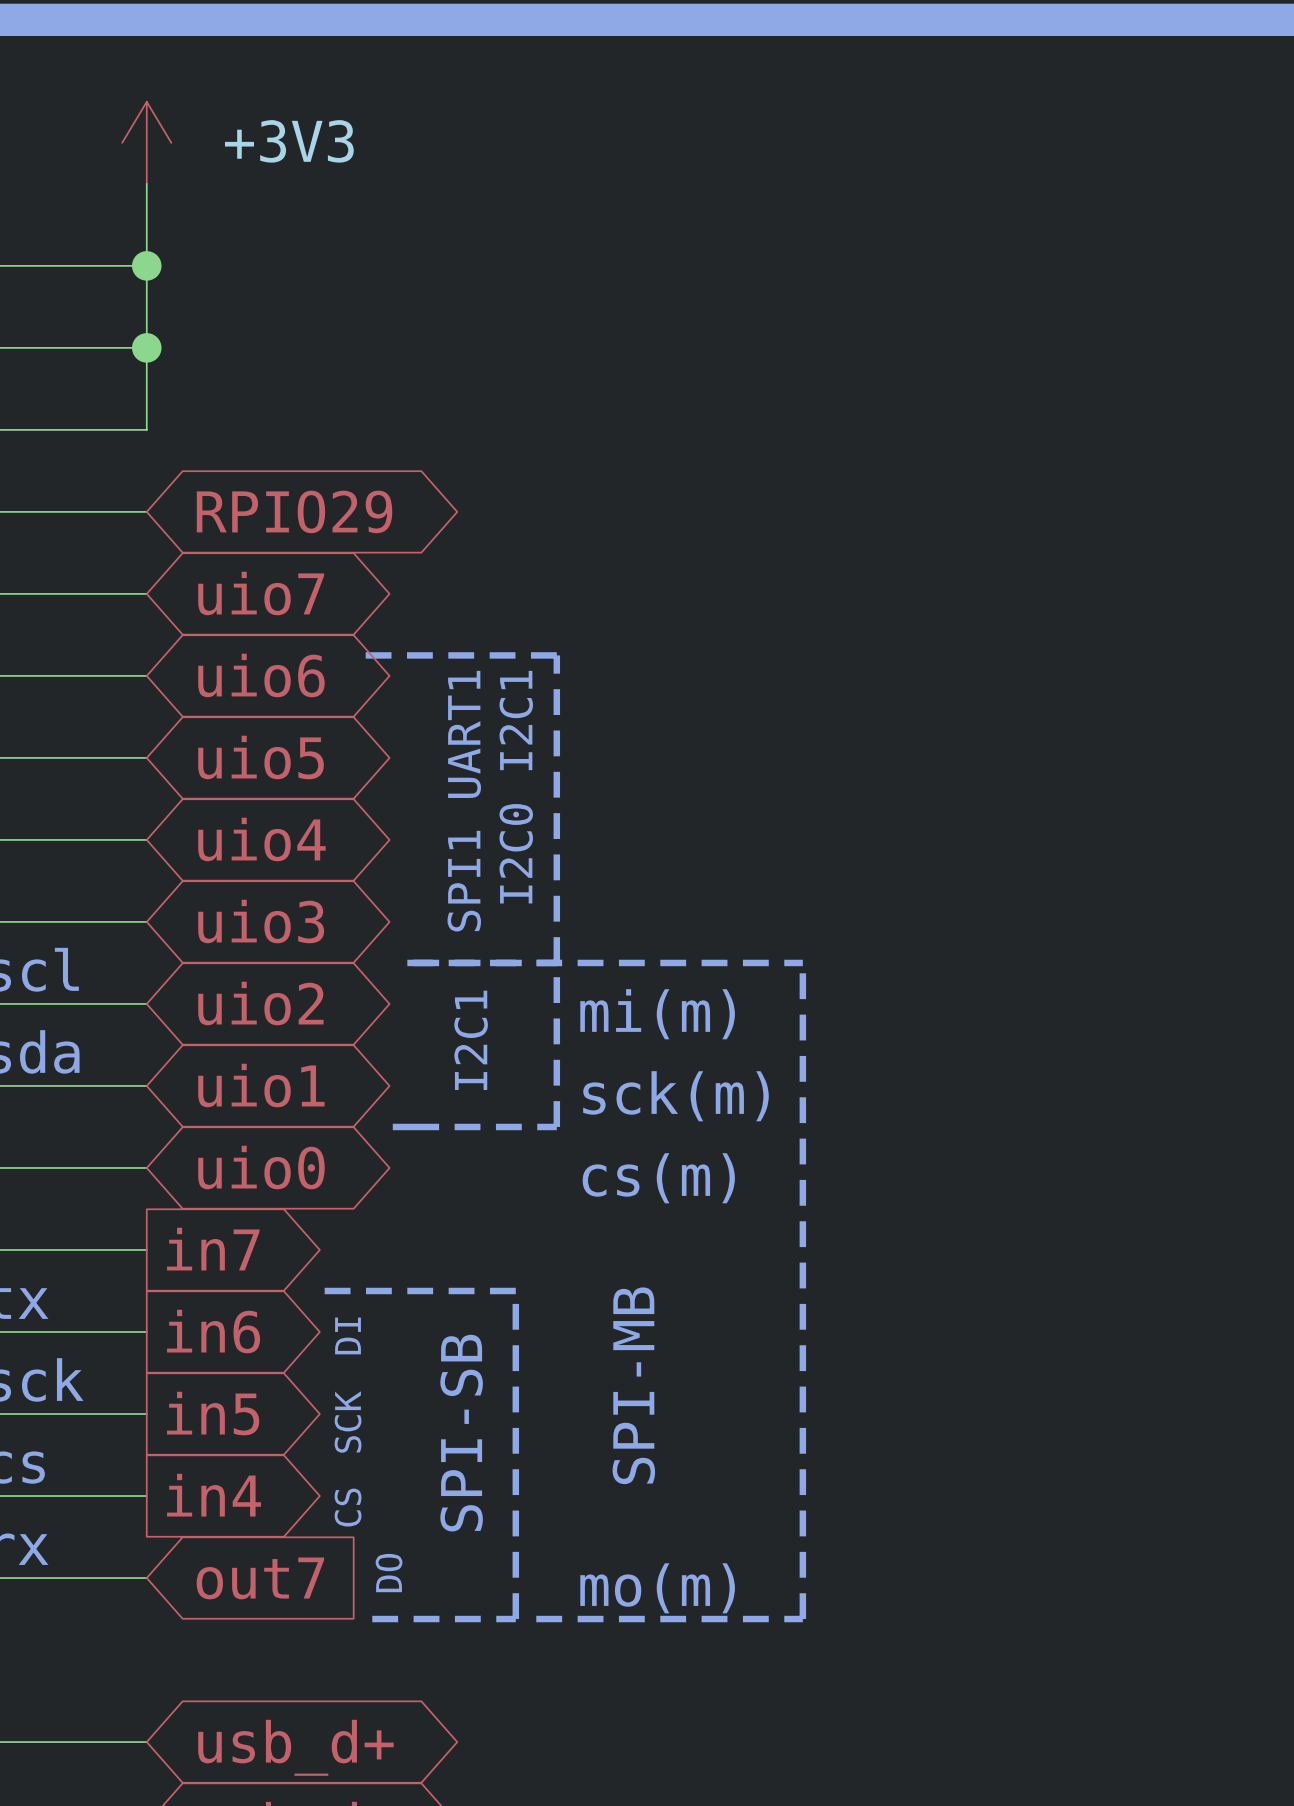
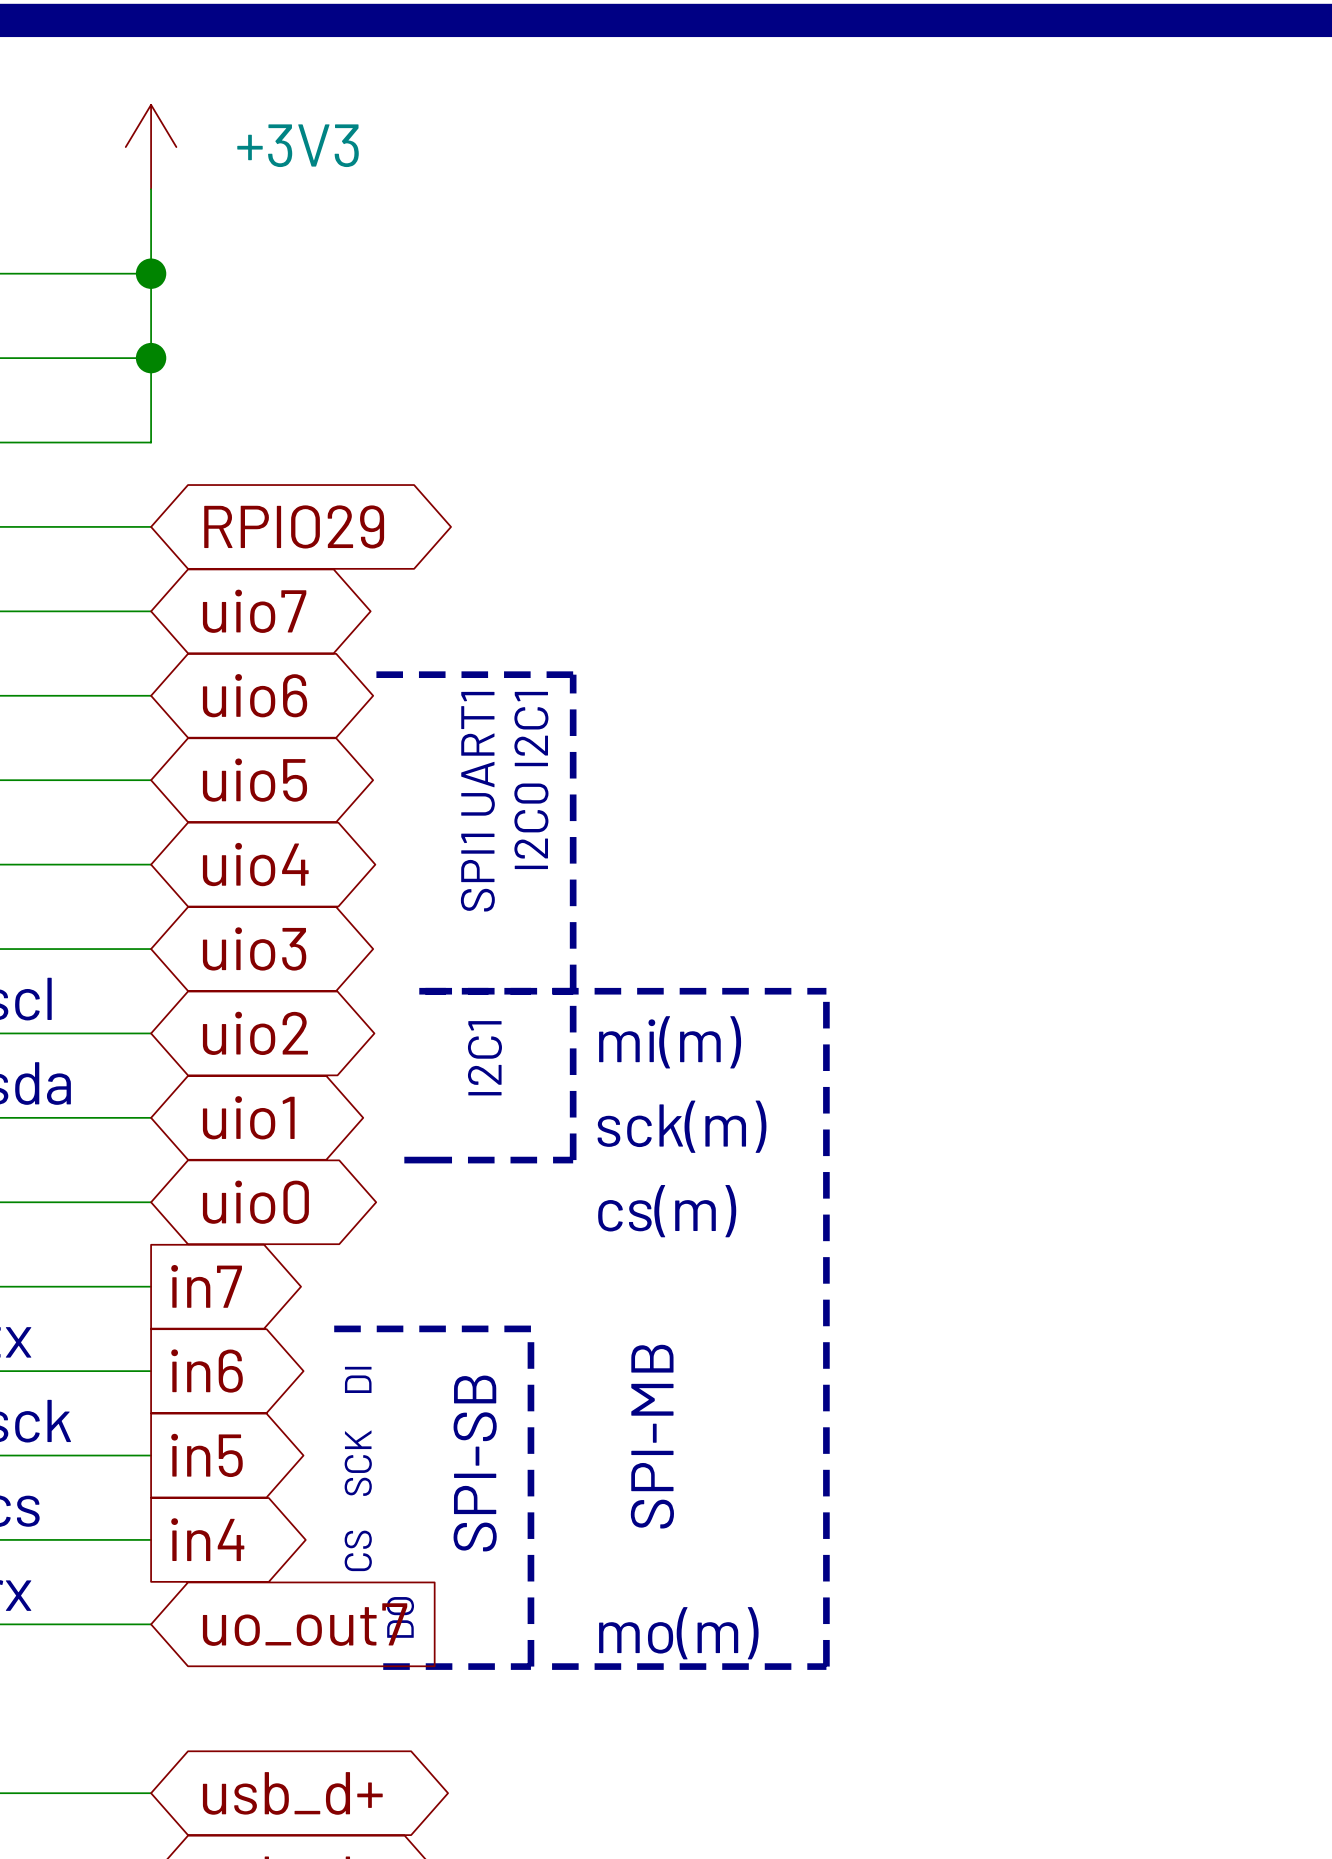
global label: out7 (260, 1578) -> uo_out7 (305, 1624)

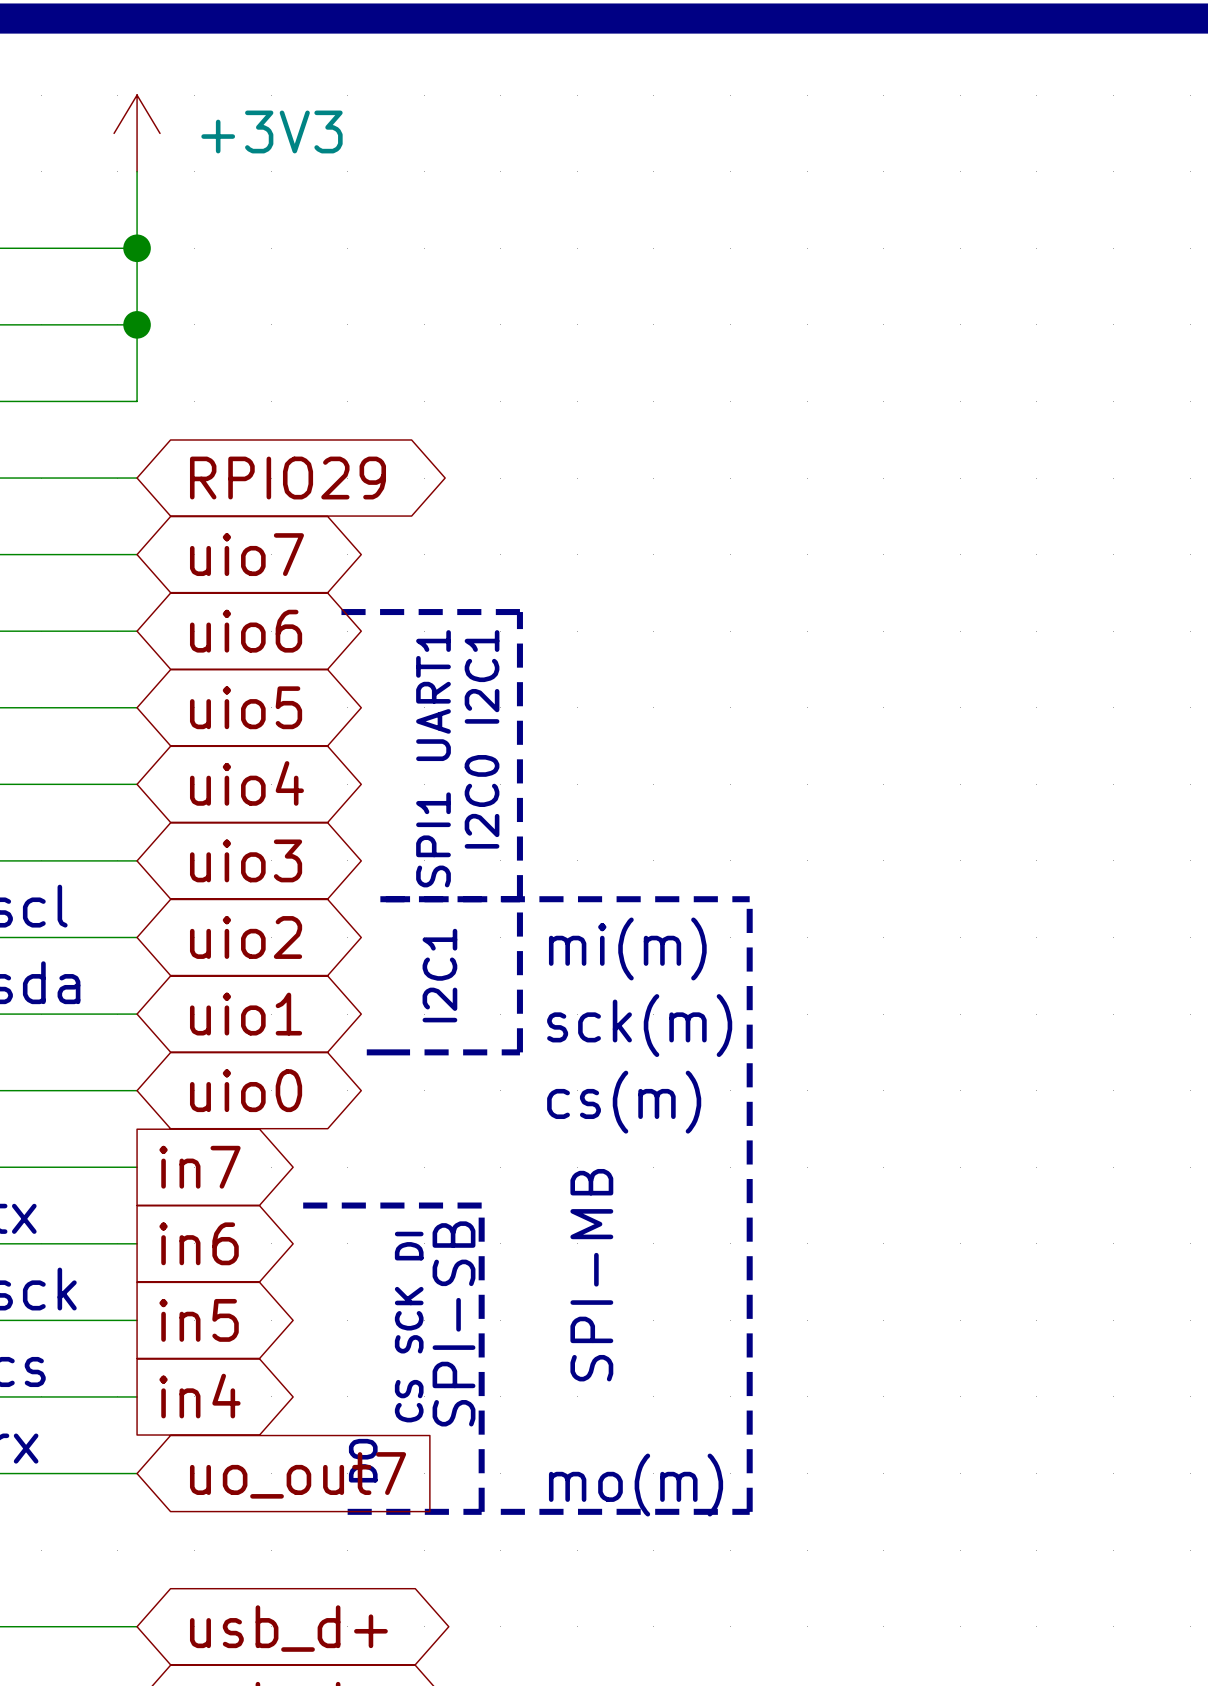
text position: DI (358, 1379) -> DI (409, 1246)
text position: SCK (358, 1463) -> SCK (409, 1320)
text position: SPI-SB (475, 1463) -> SPI-SB (454, 1323)
text position: CS (358, 1550) -> CS (409, 1401)

